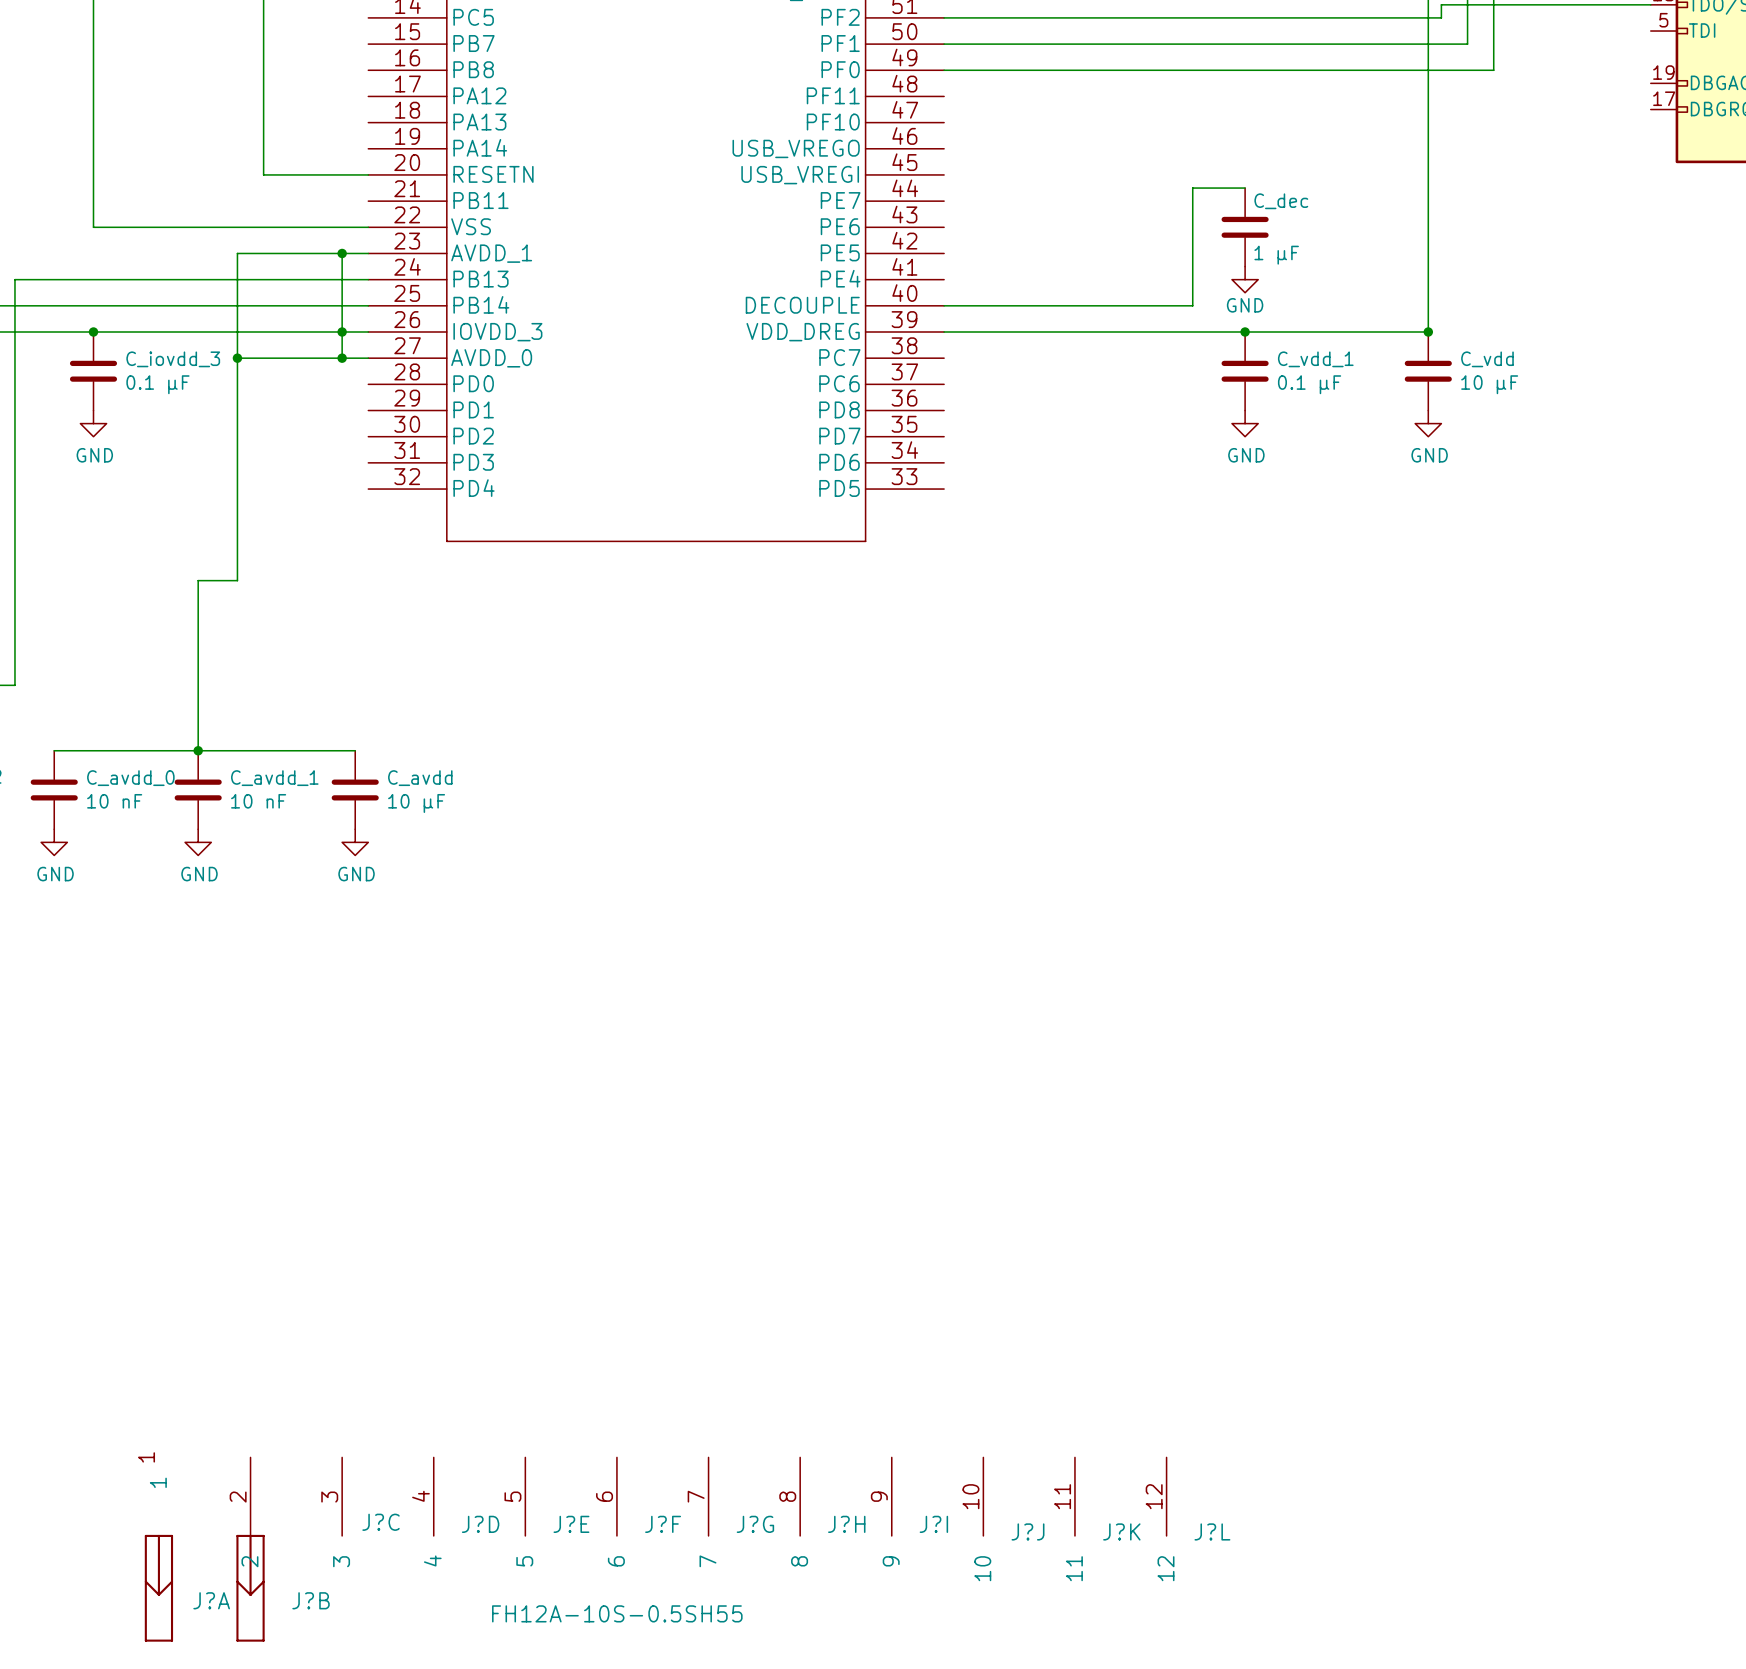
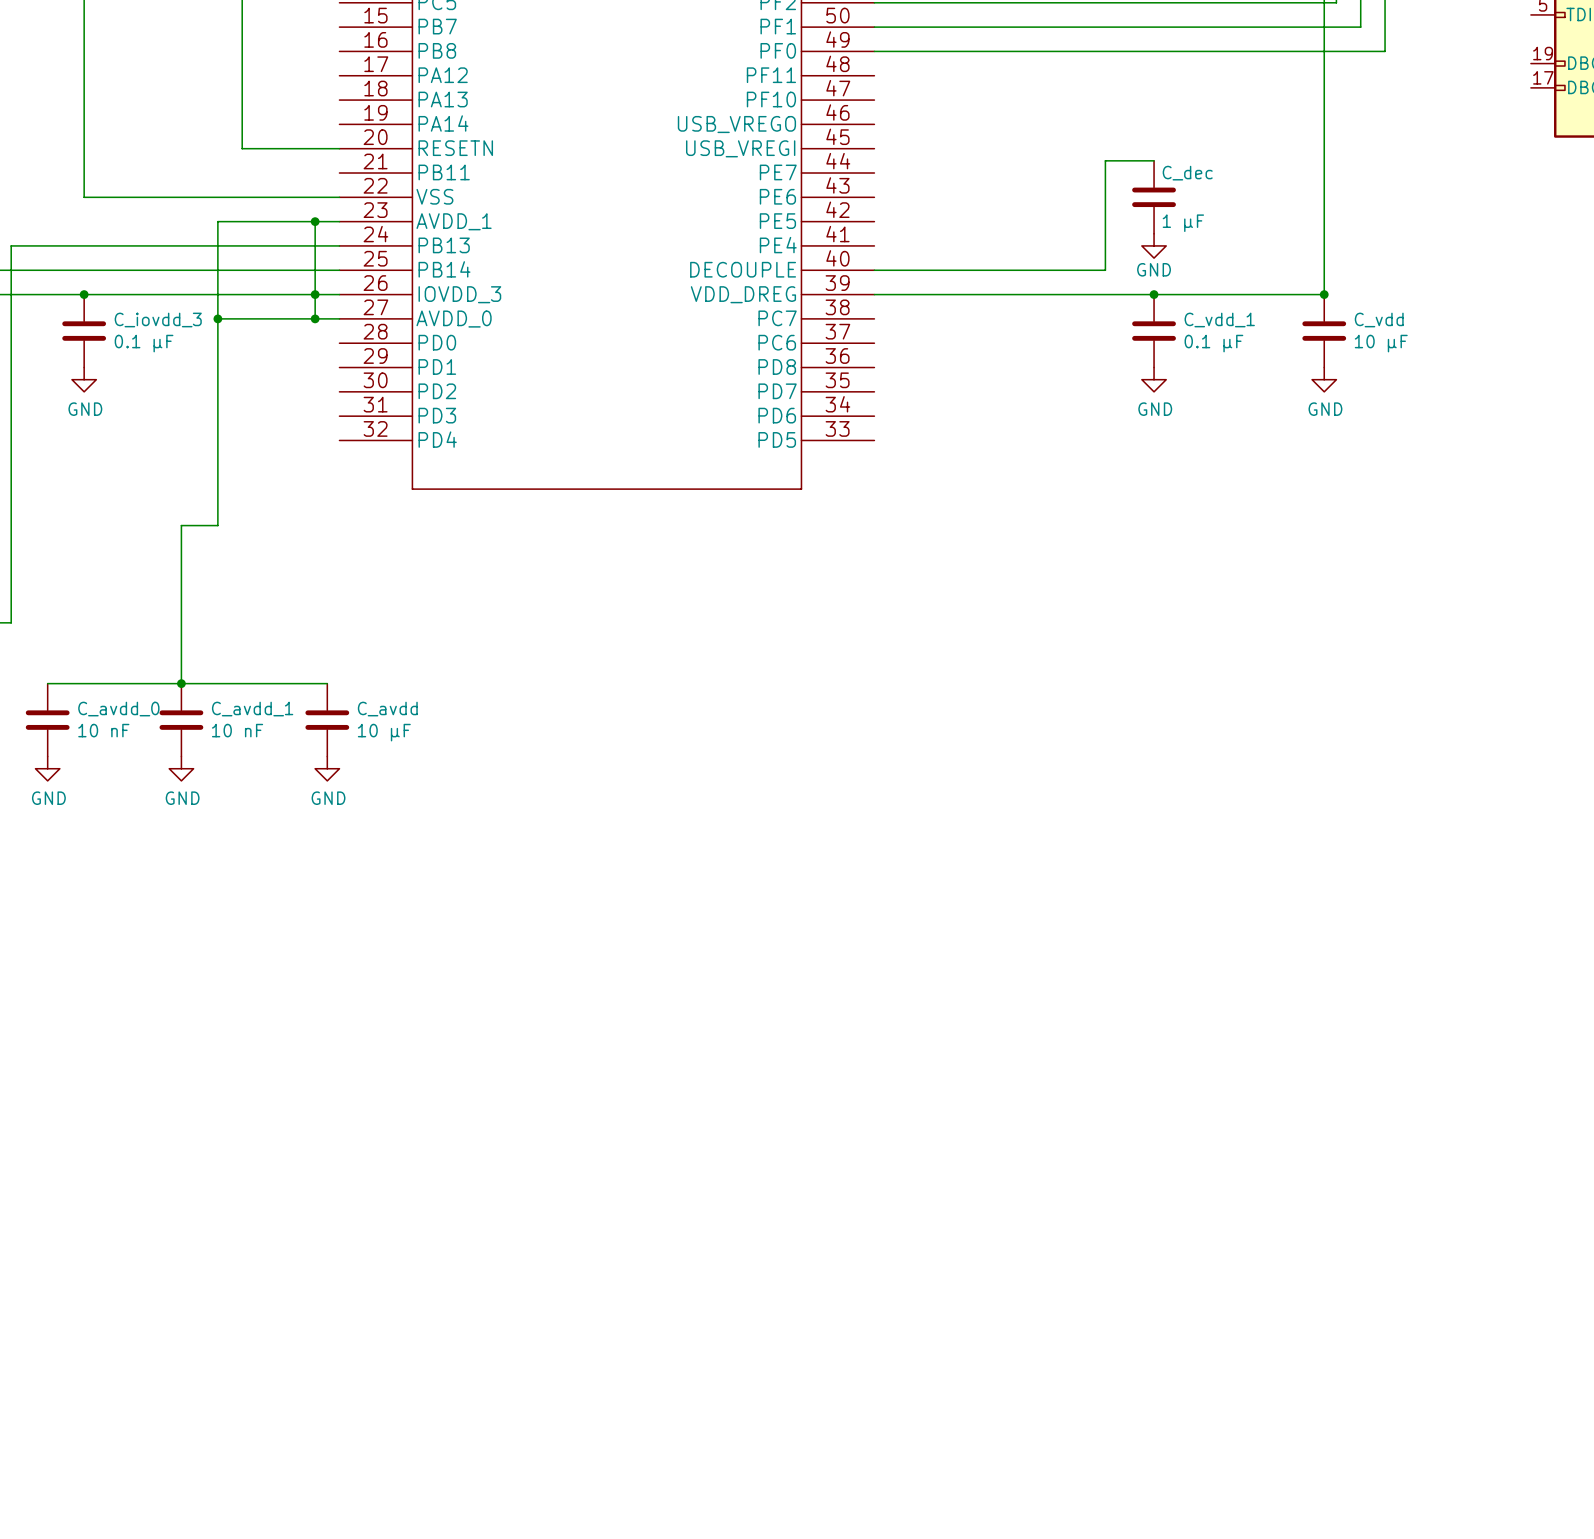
J?C: (342, 1496) -> none
J?D: (433, 1496) -> none
J?E: (525, 1496) -> none
J?F: (616, 1496) -> none
J?G: (708, 1496) -> none
J?H: (800, 1496) -> none
J?I: (891, 1496) -> none
J?J: (983, 1496) -> none
J?K: (1074, 1496) -> none
J?L: (1166, 1496) -> none
J?B: (250, 1549) -> none
J?A: FH12A-10S-0.5SH55 (158, 1588) -> none

